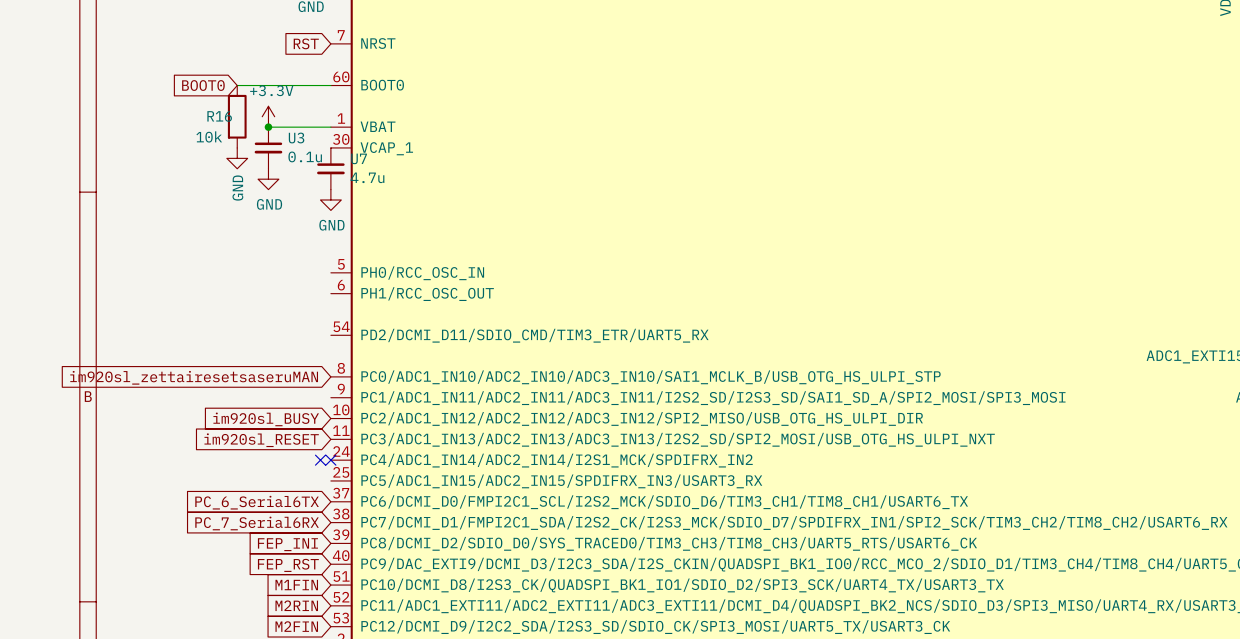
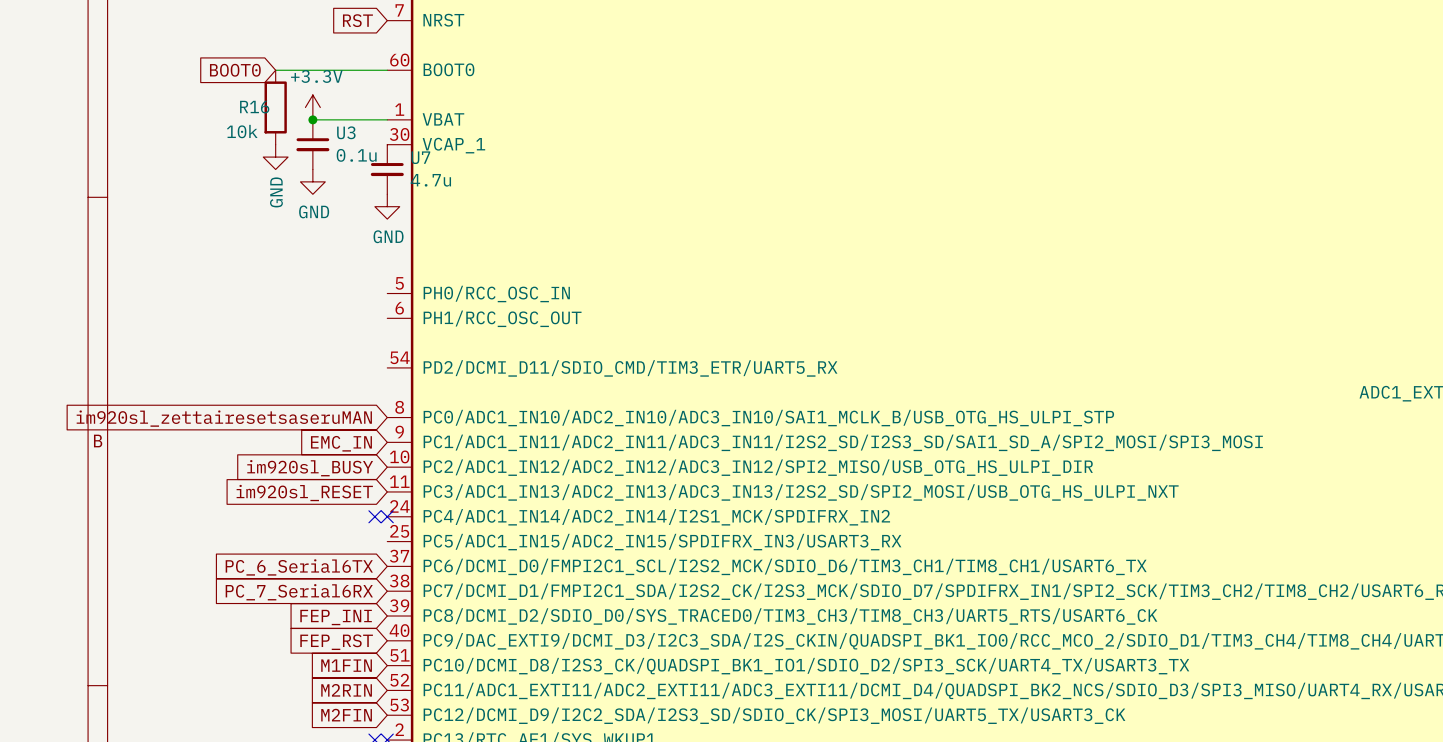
global label: none -> EMC_IN (341, 443)

